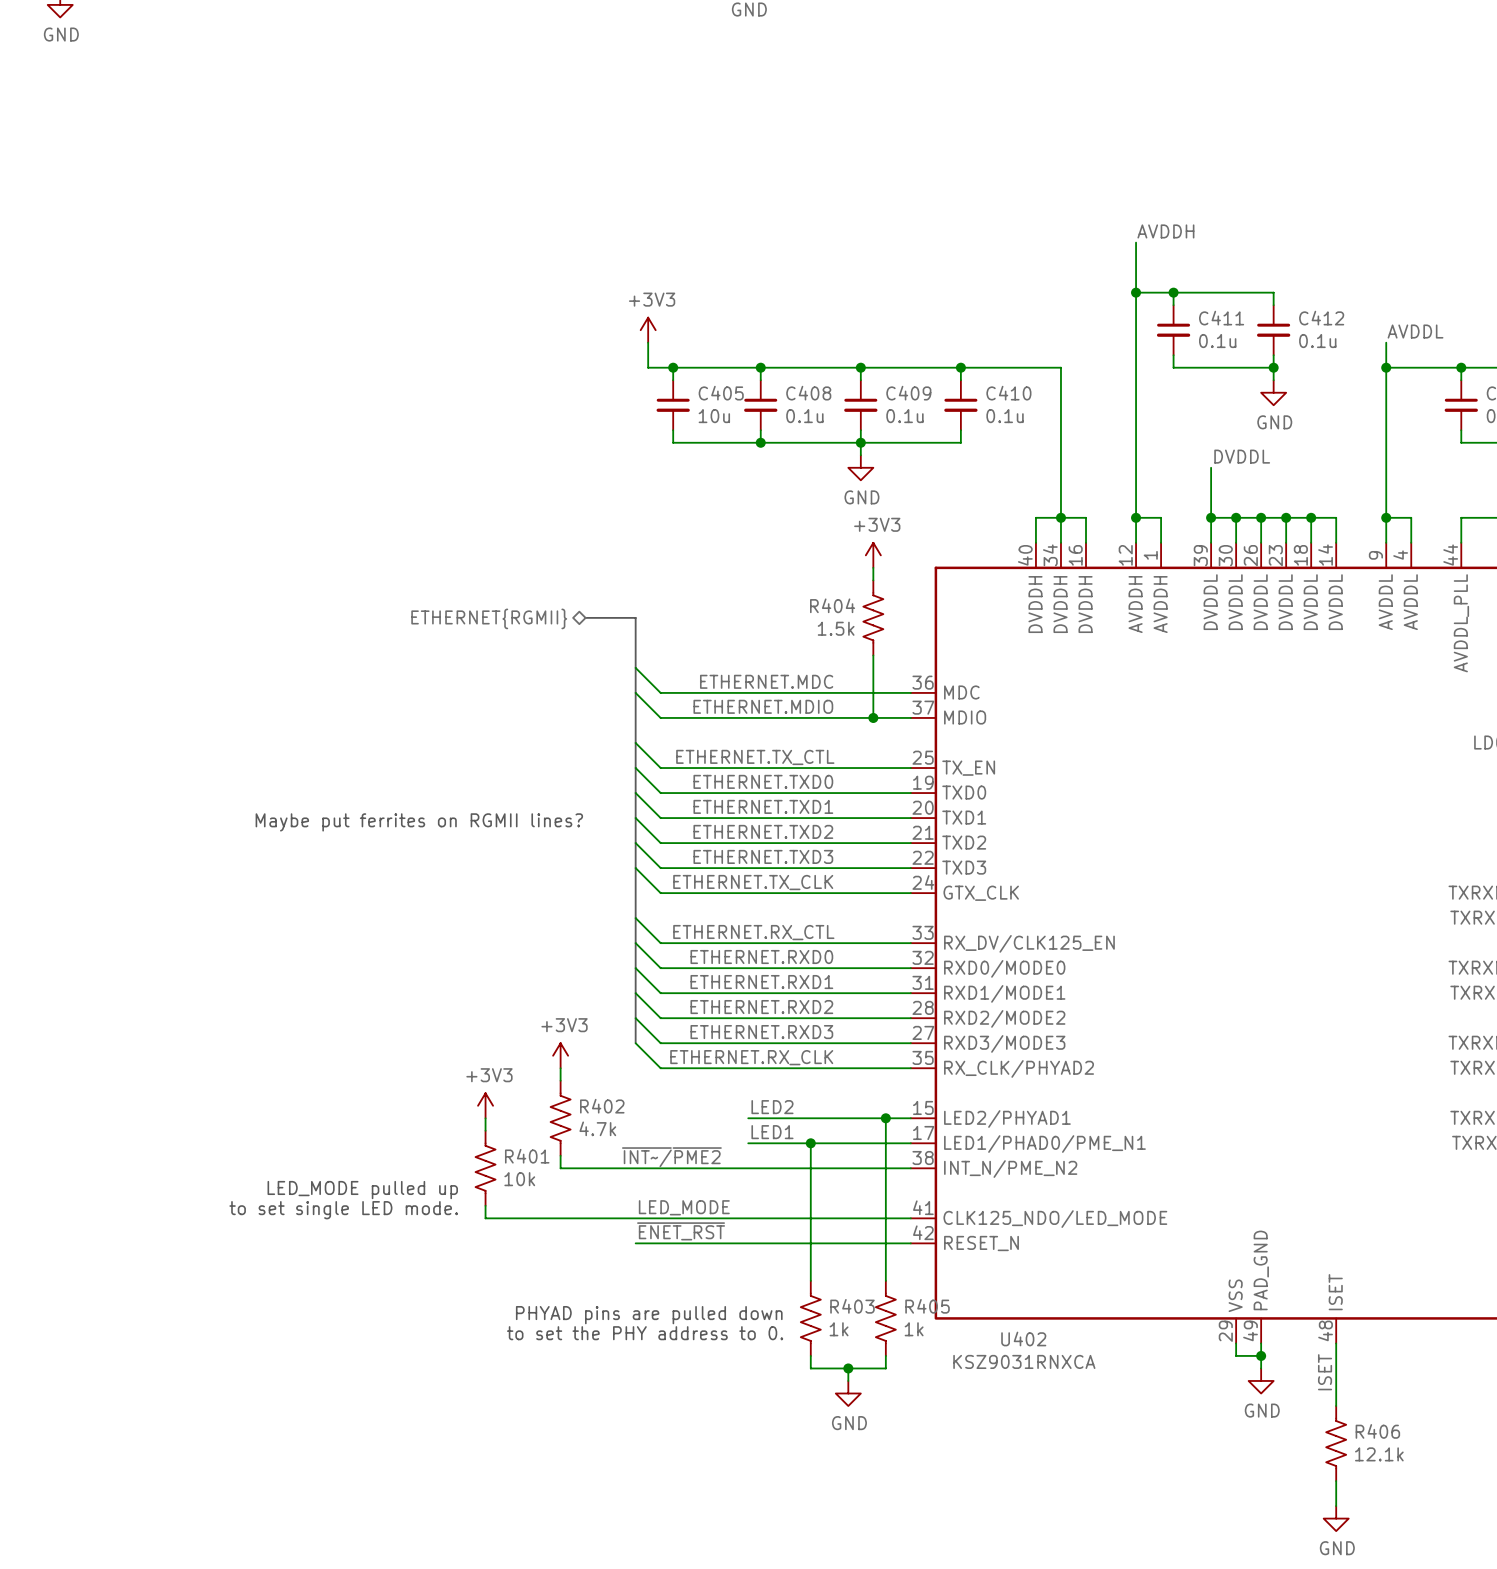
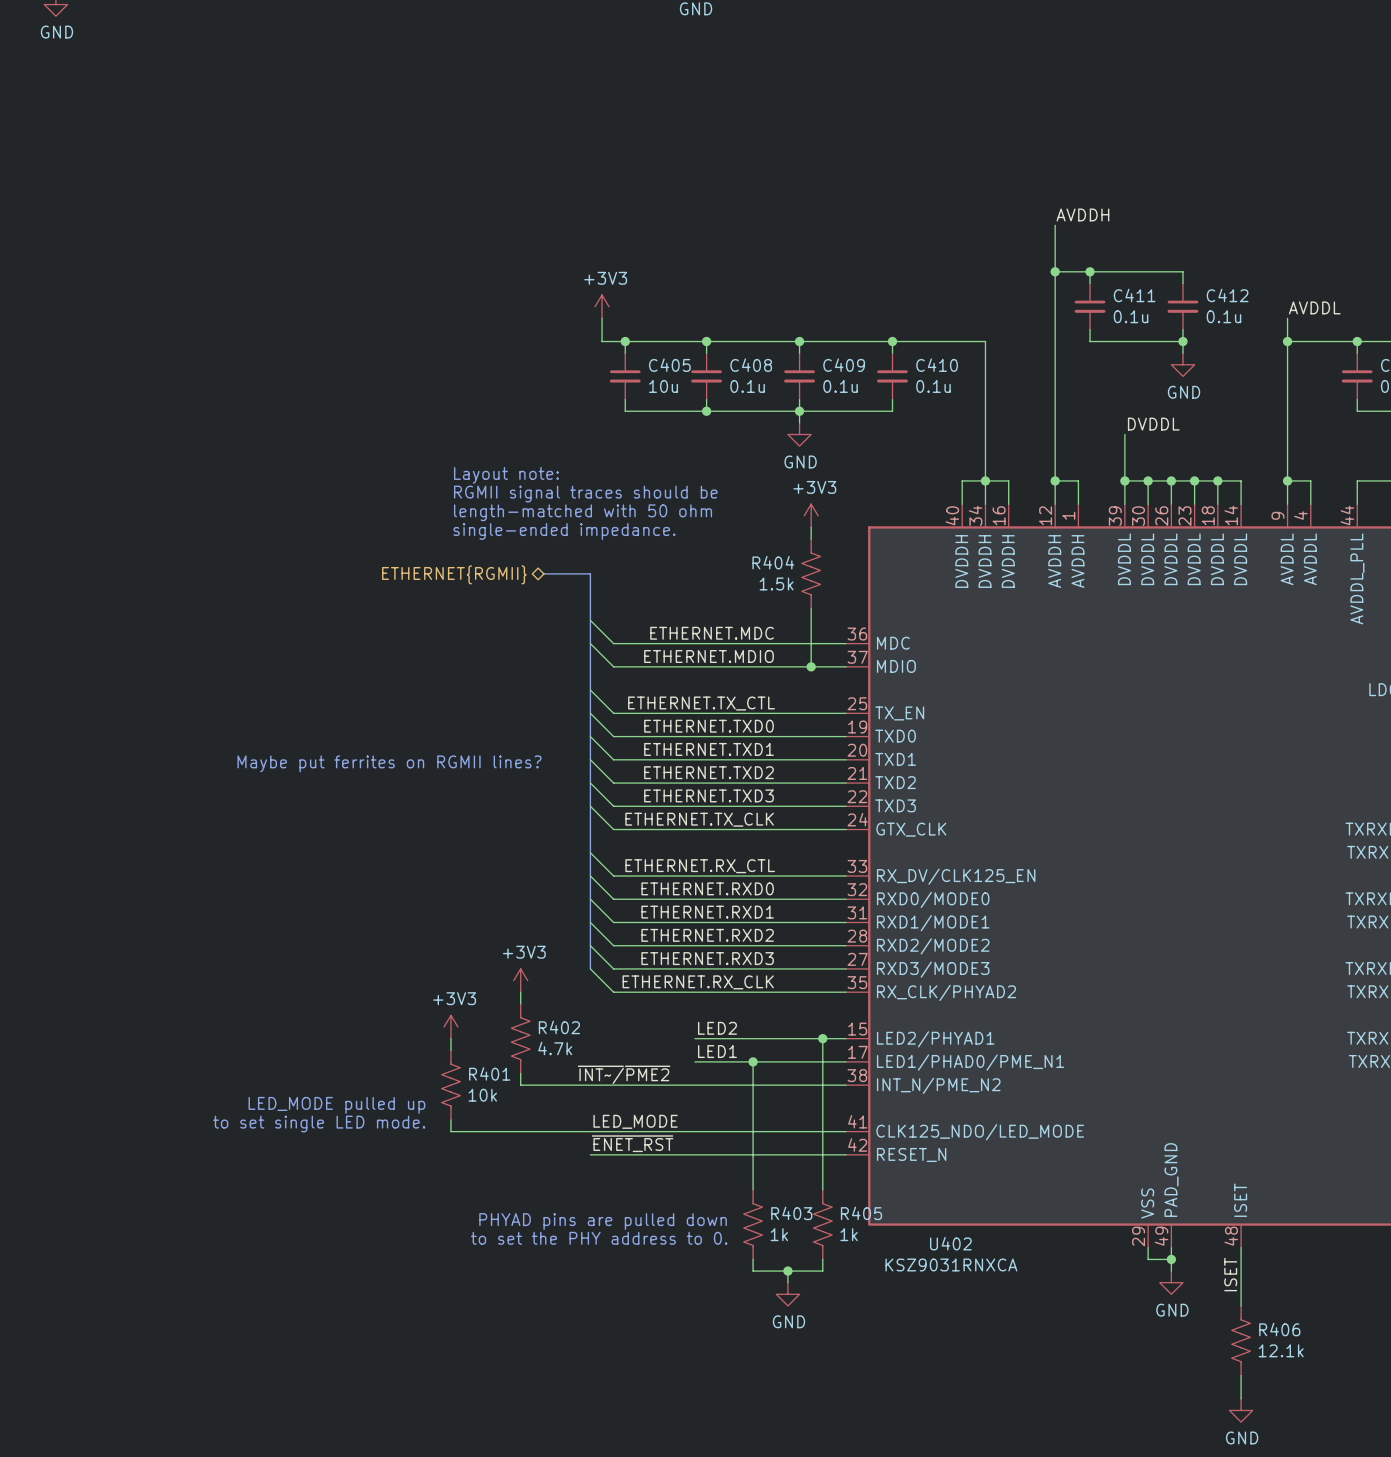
text: none -> Layout note: (506, 475)
text: none -> RGMII signal traces should be (585, 494)
text: none -> length-matched with 50 ohm (583, 512)
text: none -> single-ended impedance. (564, 531)

